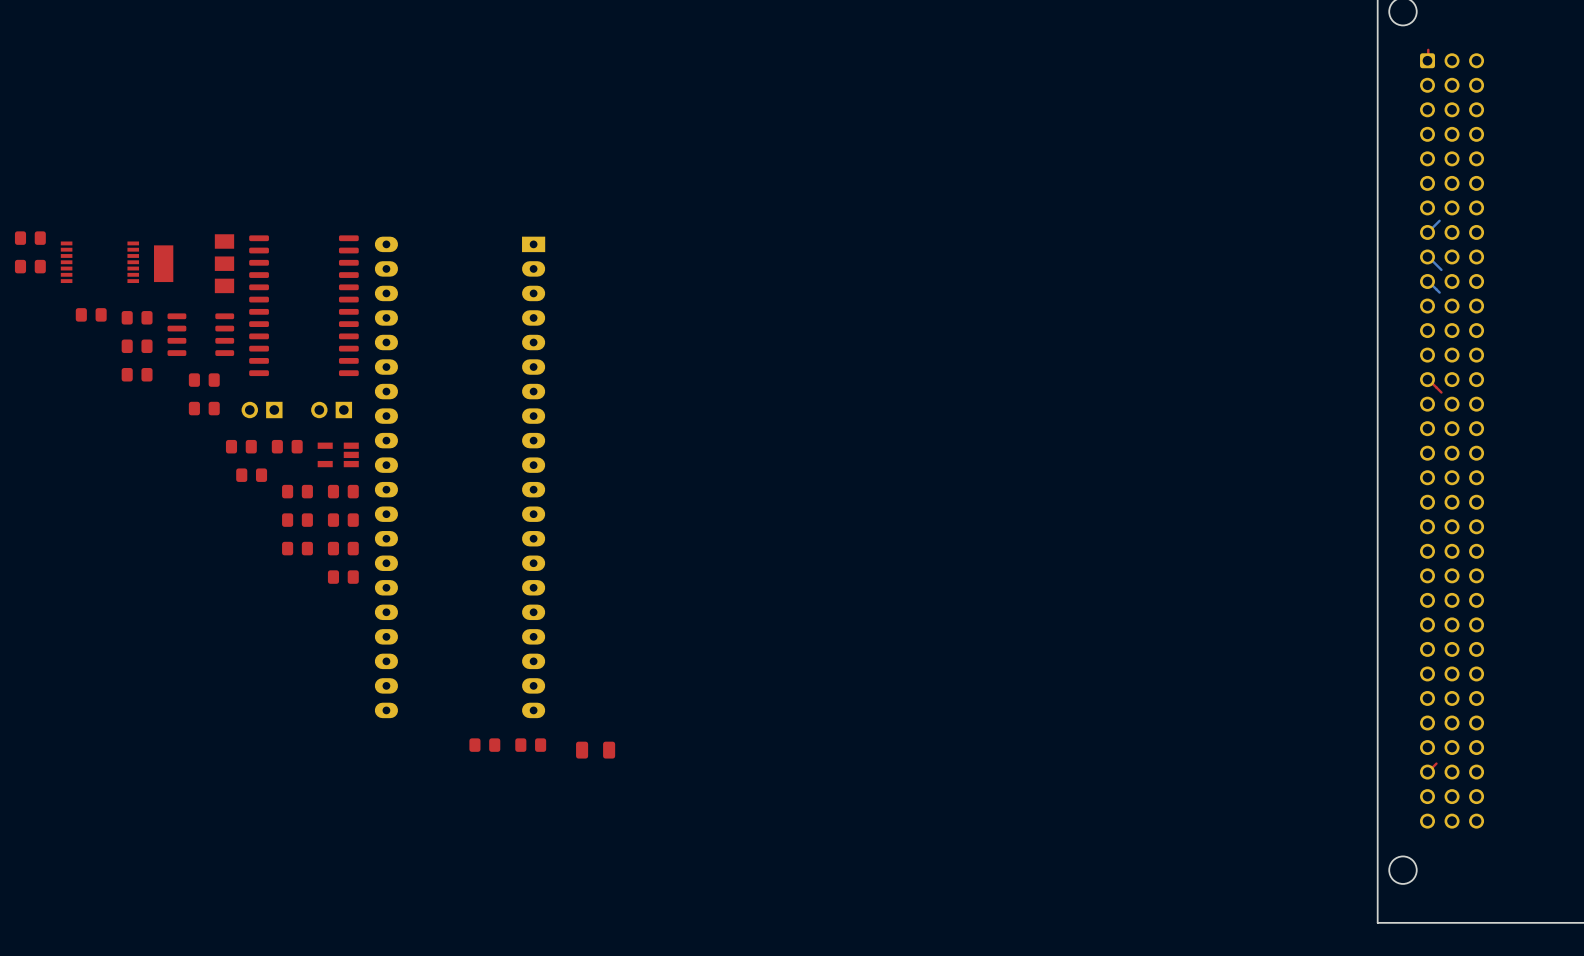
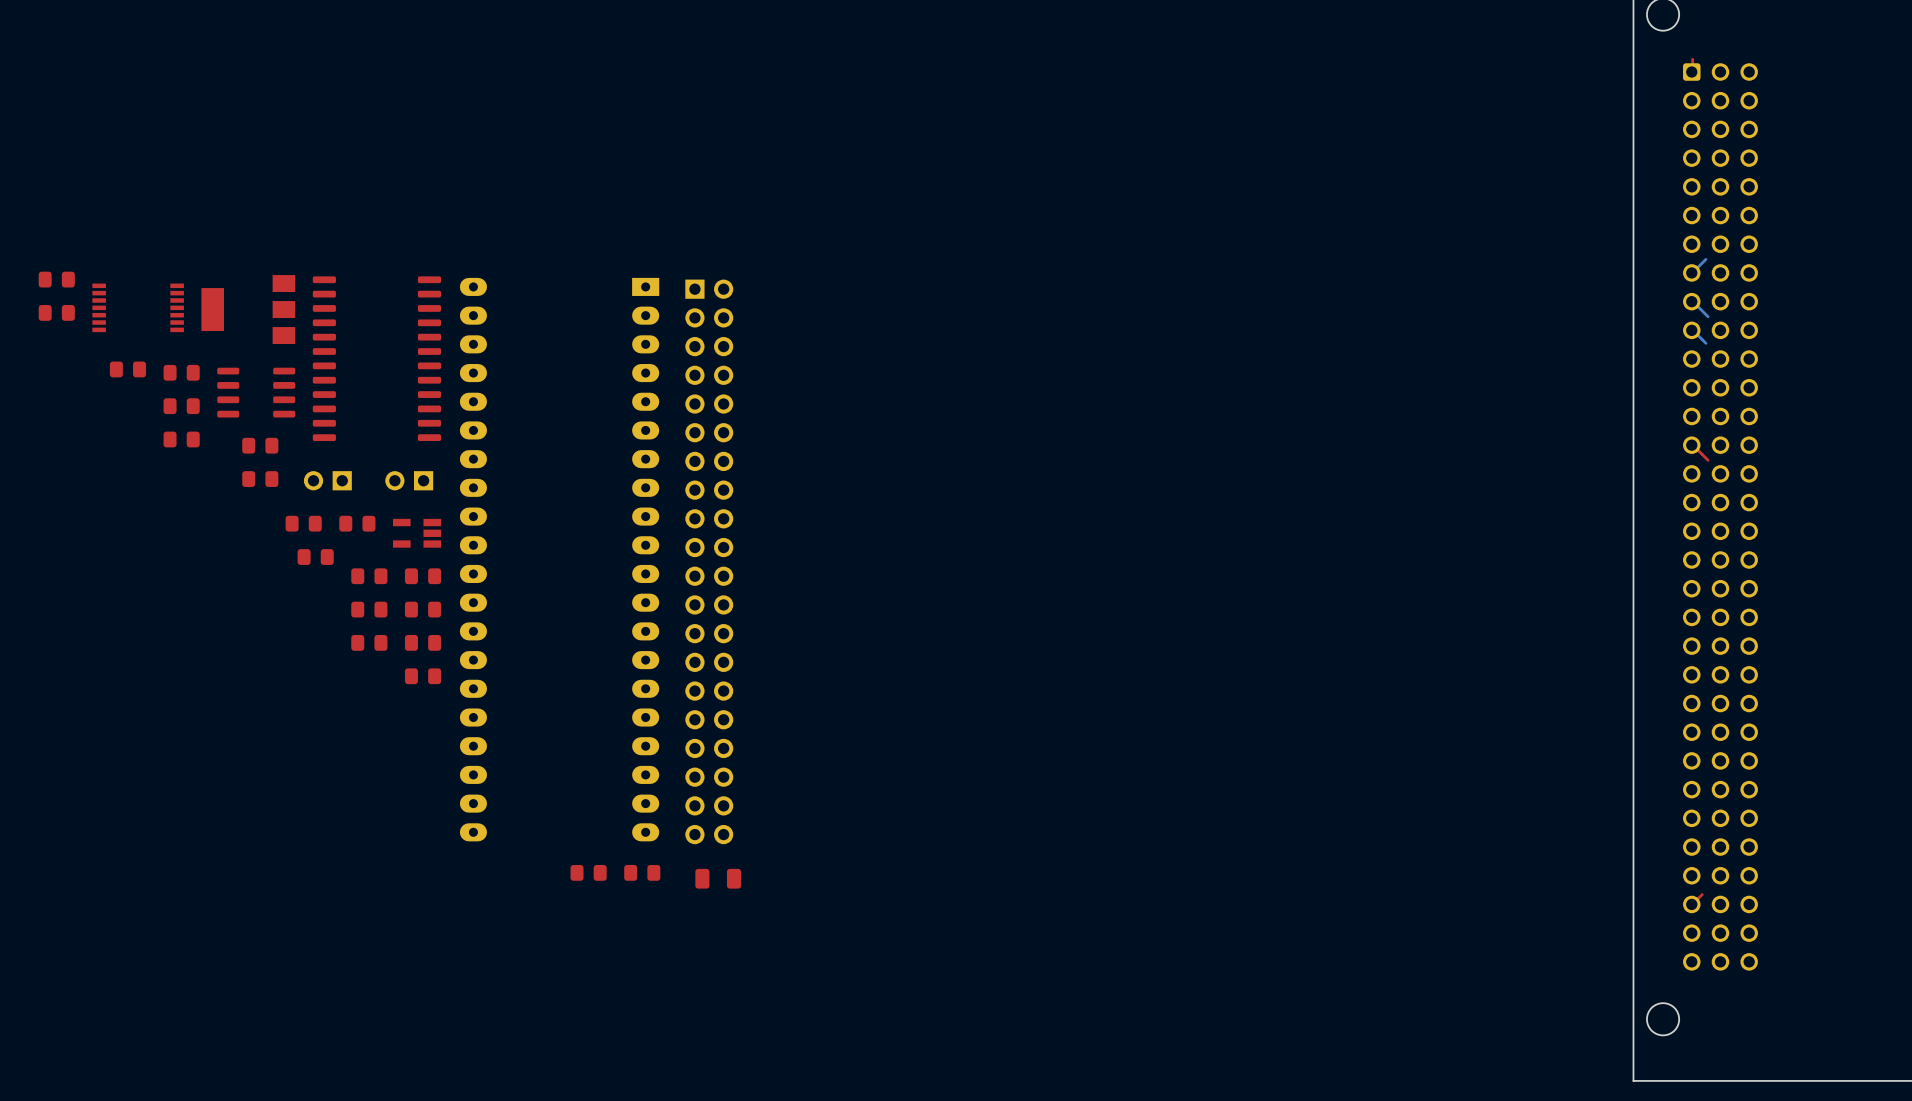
part: none -> (709, 561)

